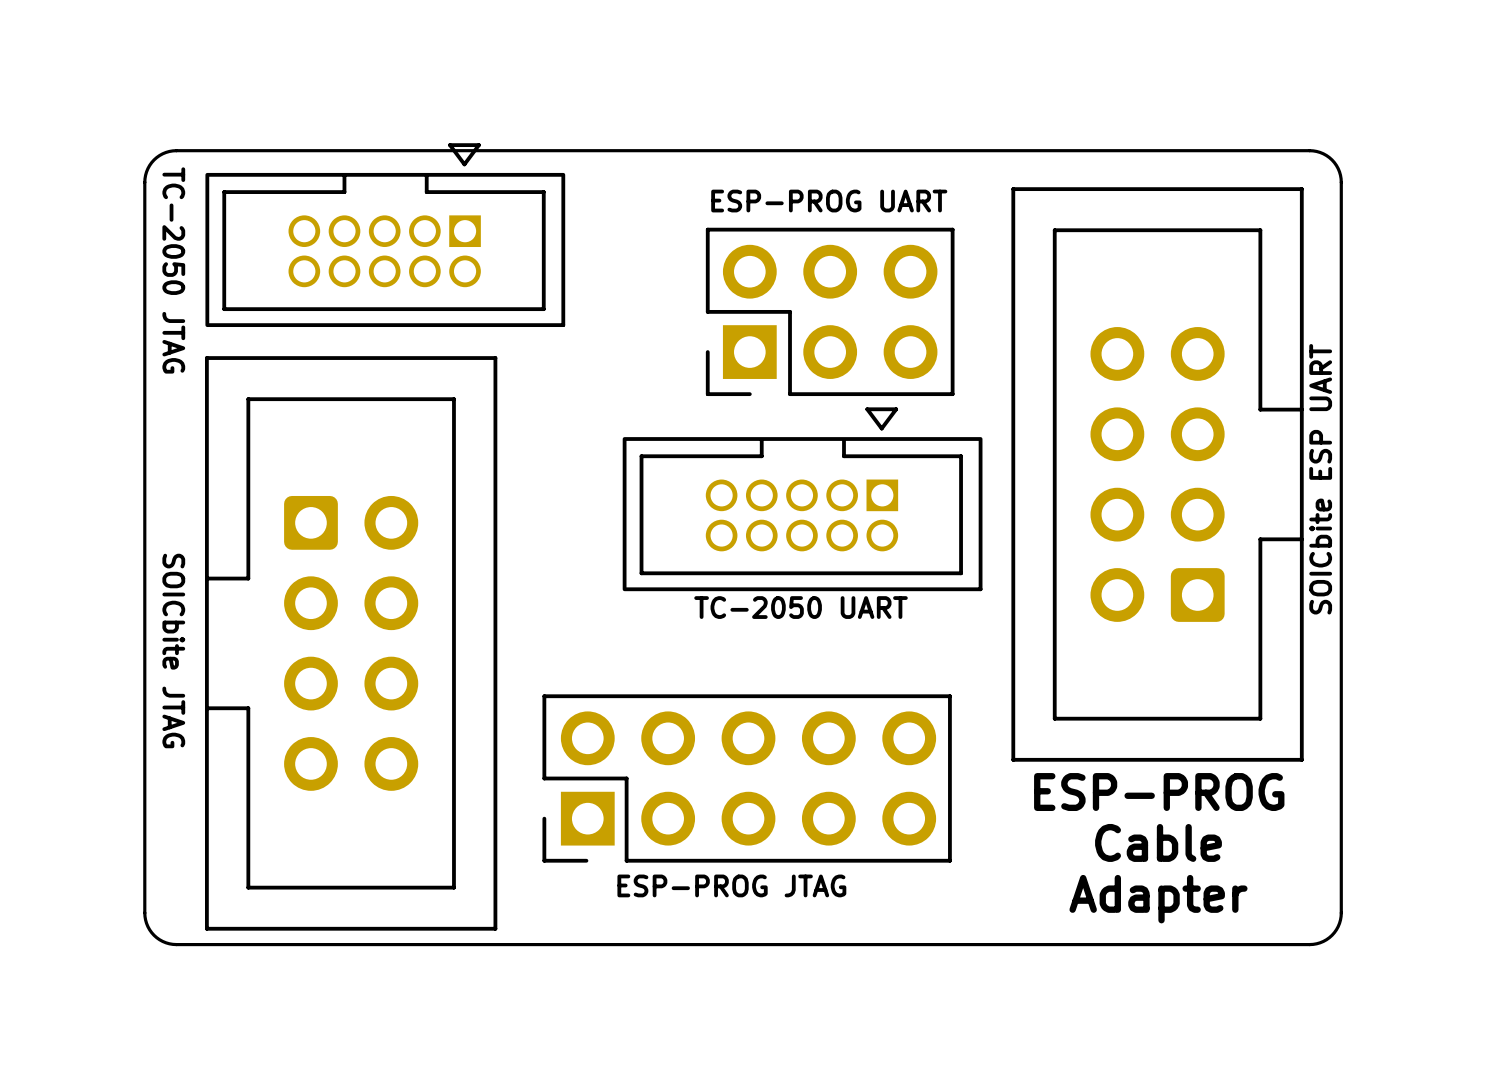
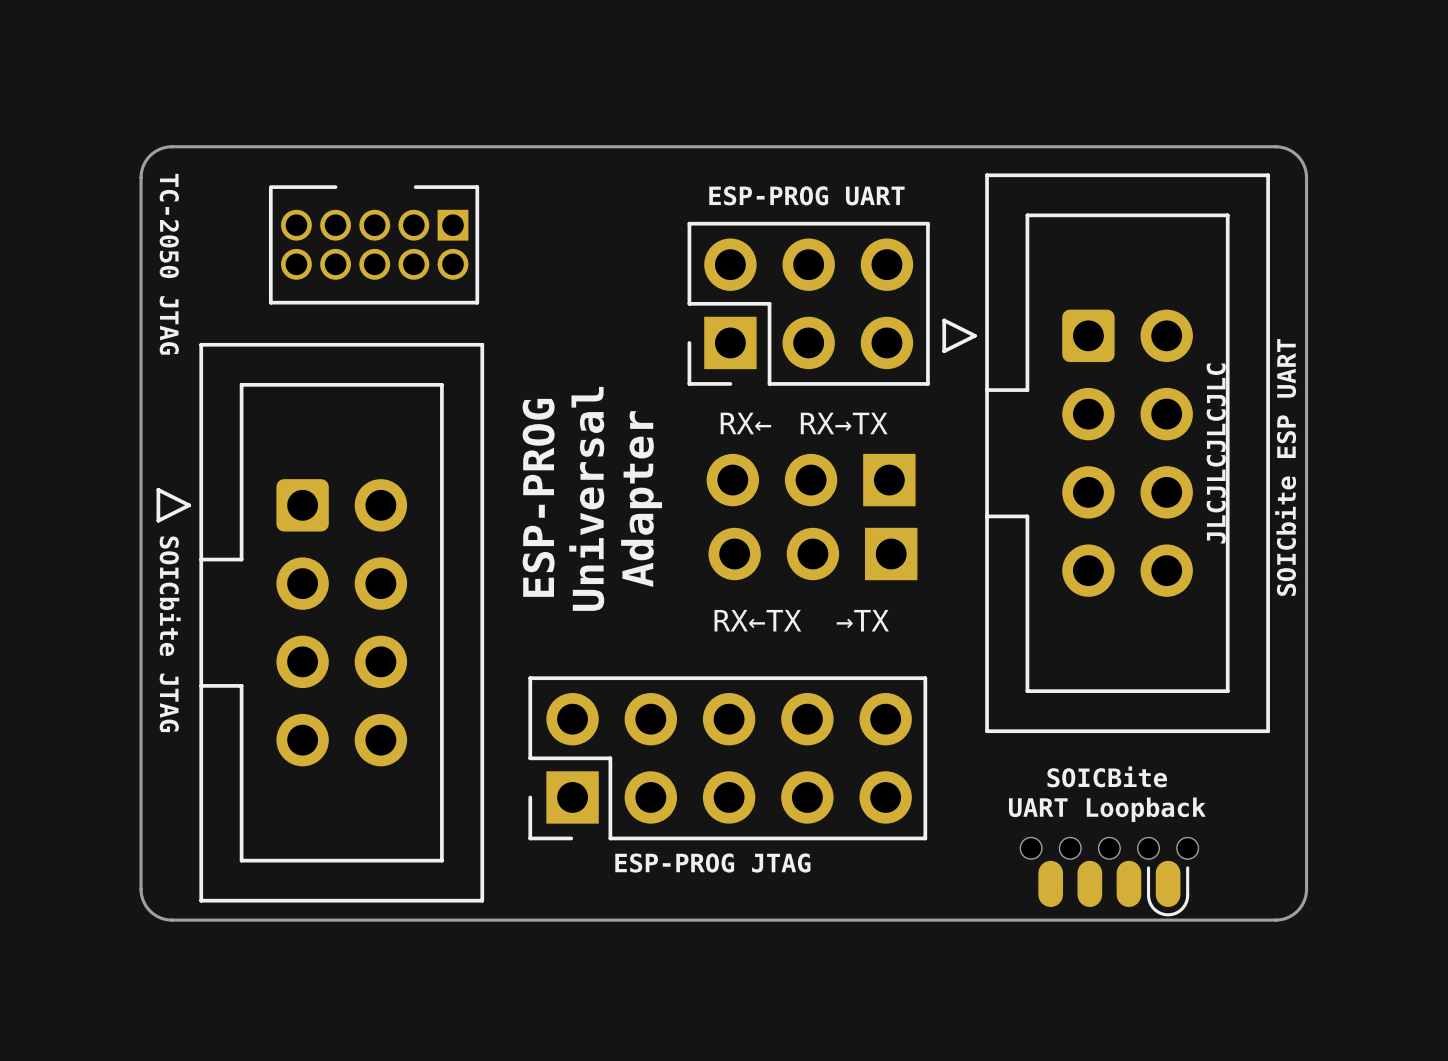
part footprint: [205, 143, 566, 328] -> [268, 185, 480, 305]
part footprint: [1011, 187, 1304, 762] -> [942, 173, 1270, 734]
part footprint: [205, 356, 498, 931] -> [156, 342, 485, 903]
part footprint: [622, 407, 983, 592] -> [706, 453, 916, 507]
text: none -> RX← (745, 423)
text: none -> RX→TX (844, 423)
text: none -> JLCJLCJLCJLC (1216, 453)
text: none -> Universal (586, 498)
part: none -> (812, 554)
text: TC-2050 UART (801, 607) -> none
text: none -> RX←TX (757, 620)
text: none -> →TX (862, 620)
text rotation: 0° (1159, 792) -> 90° counterclockwise (538, 497)
text position: ESP-PROG (1159, 792) -> ESP-PROG (538, 497)
text: none -> SOICBite (1107, 776)
text: none -> UART Loopback (1107, 809)
text: Cable (1158, 842) -> none
text rotation: 0° (1158, 899) -> 90° counterclockwise (641, 499)
text position: Adapter (1158, 899) -> Adapter (641, 499)
part: none -> (1109, 876)

